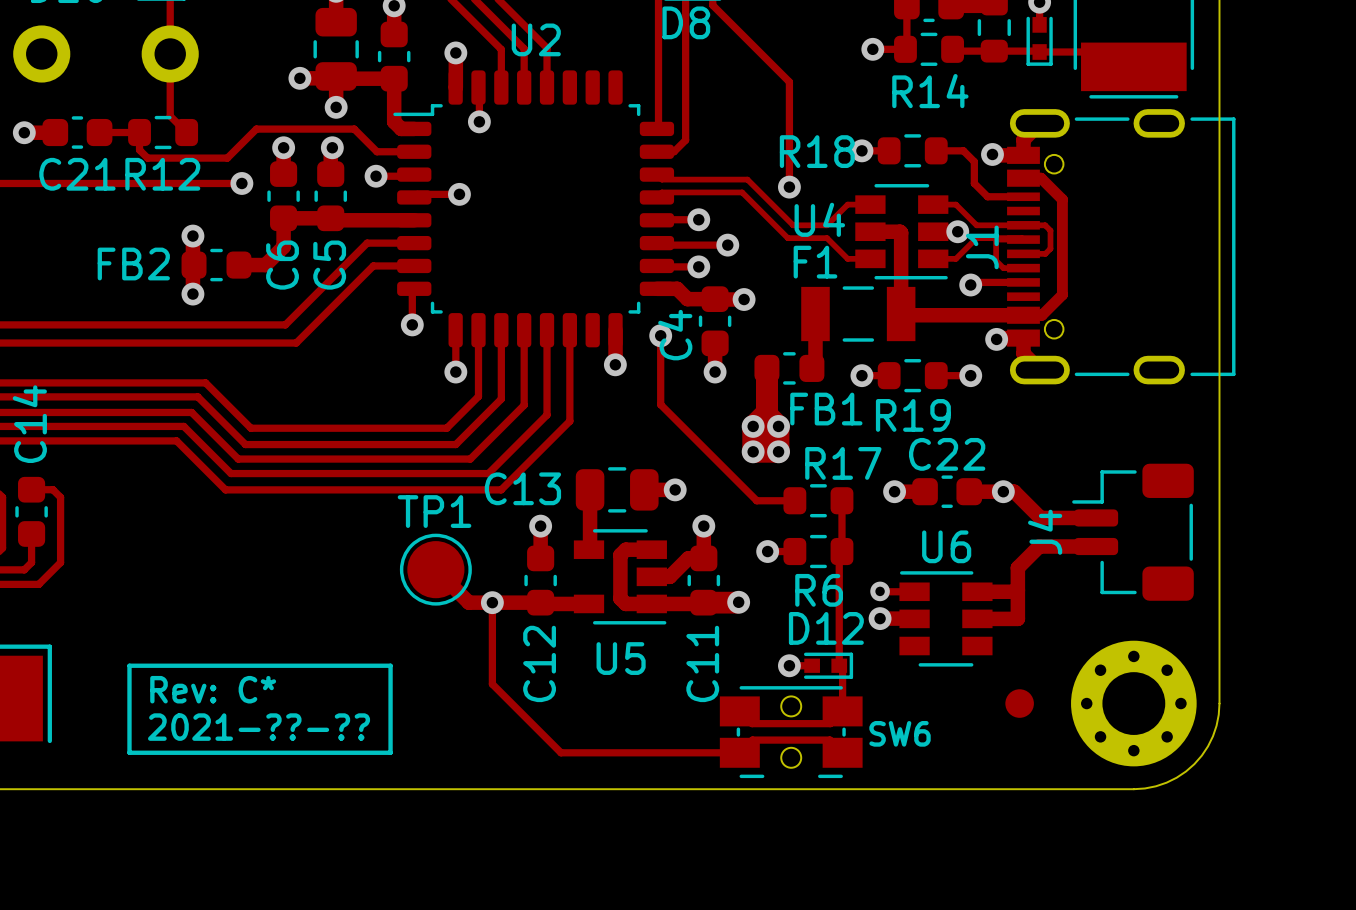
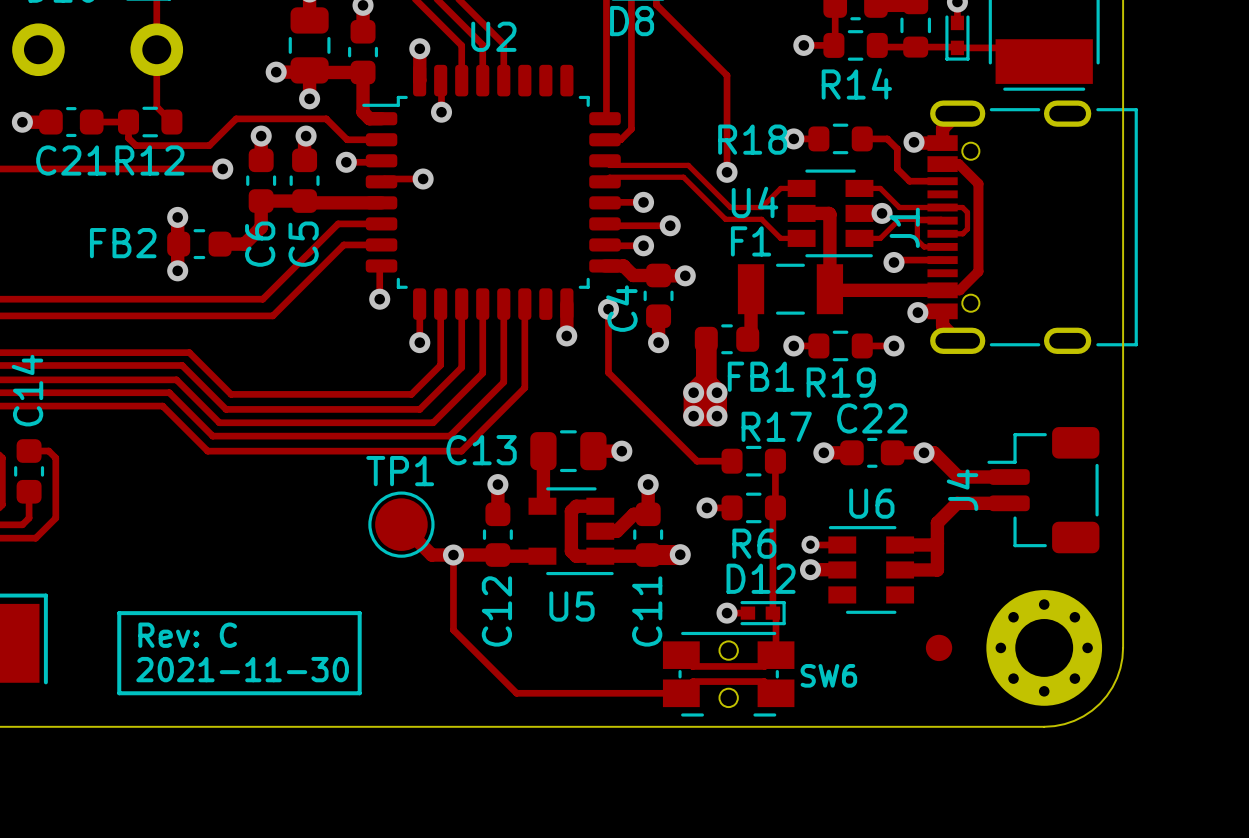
text: Rev: C* (213, 689) -> Rev: C (187, 635)
text: 2021-??-?? (259, 727) -> 2021-11-30 (242, 669)

